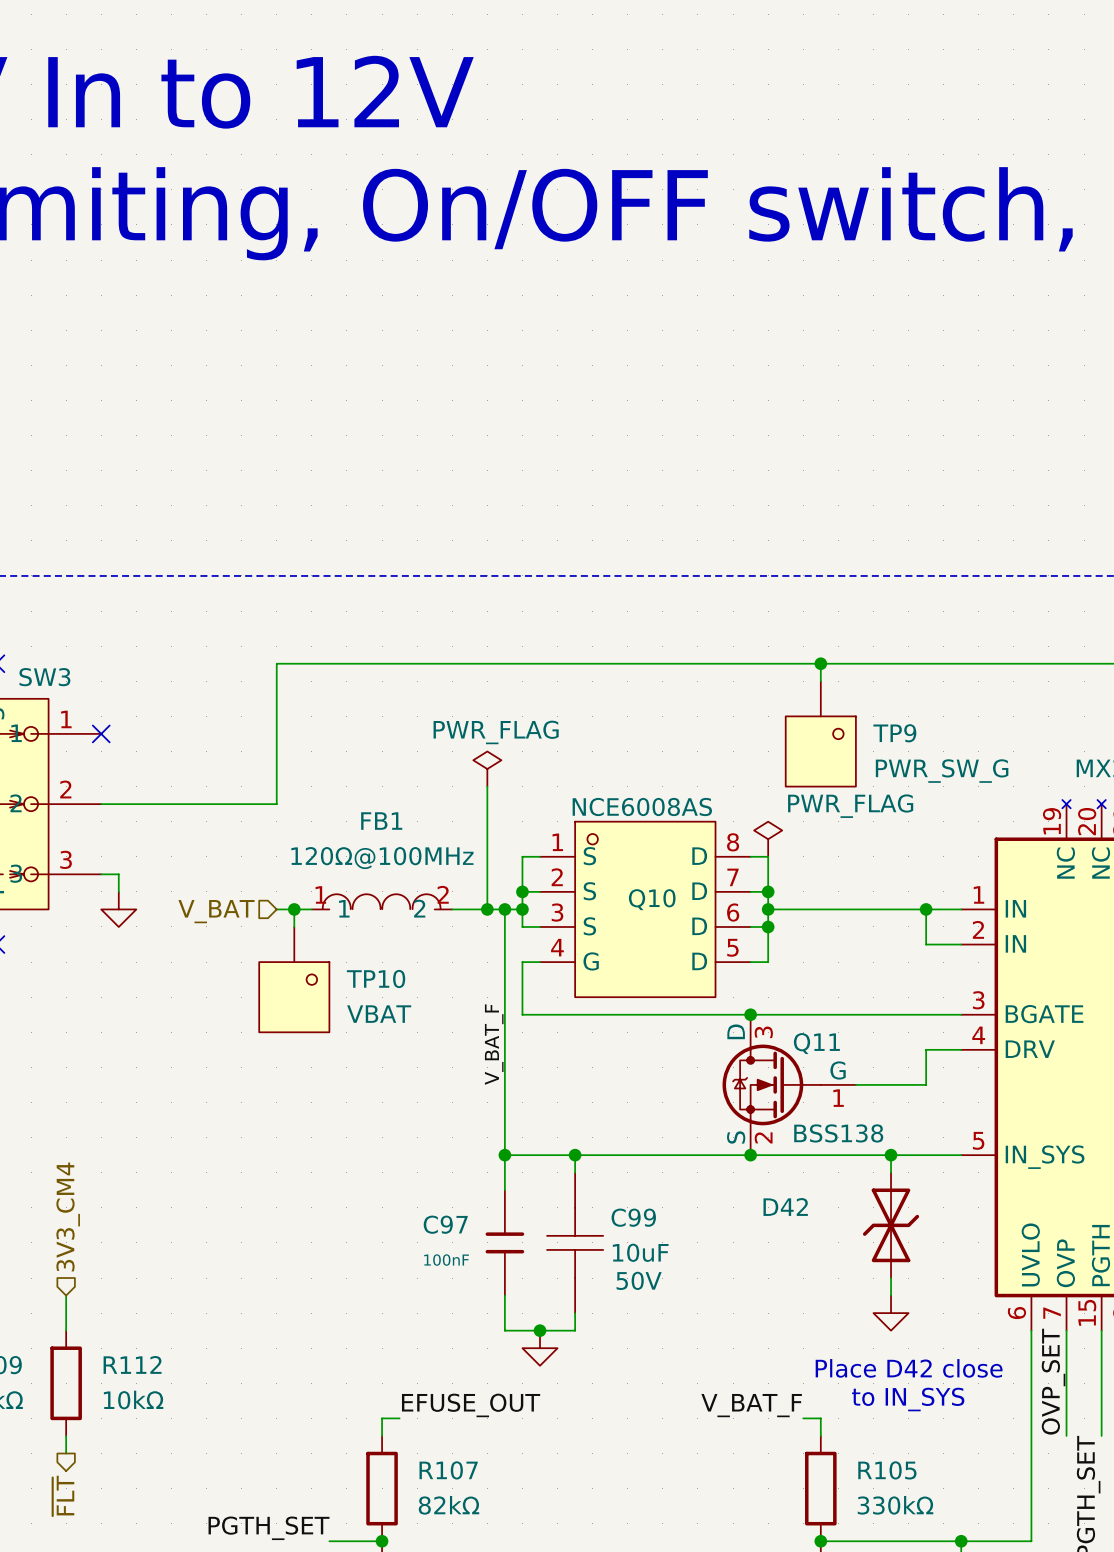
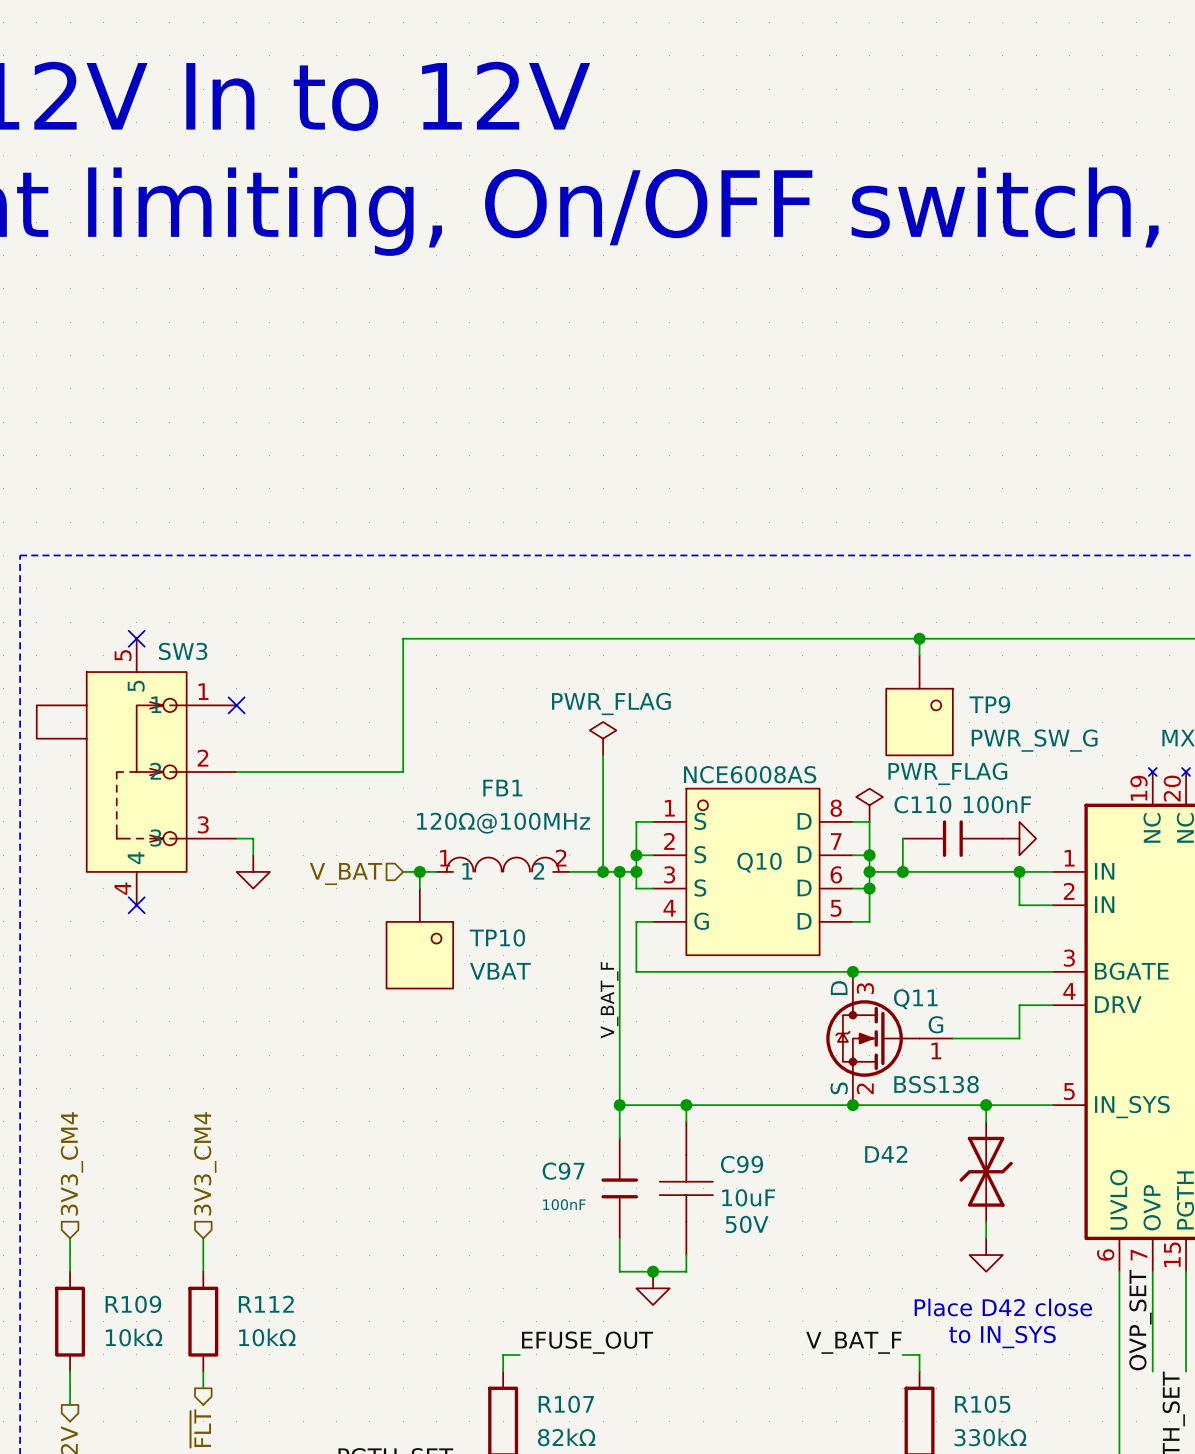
wire: none -> (902, 838) (902, 871)
C110: none -> 100nF (952, 838)
power symbol: none -> (1019, 838)
junction: none -> (902, 871)

